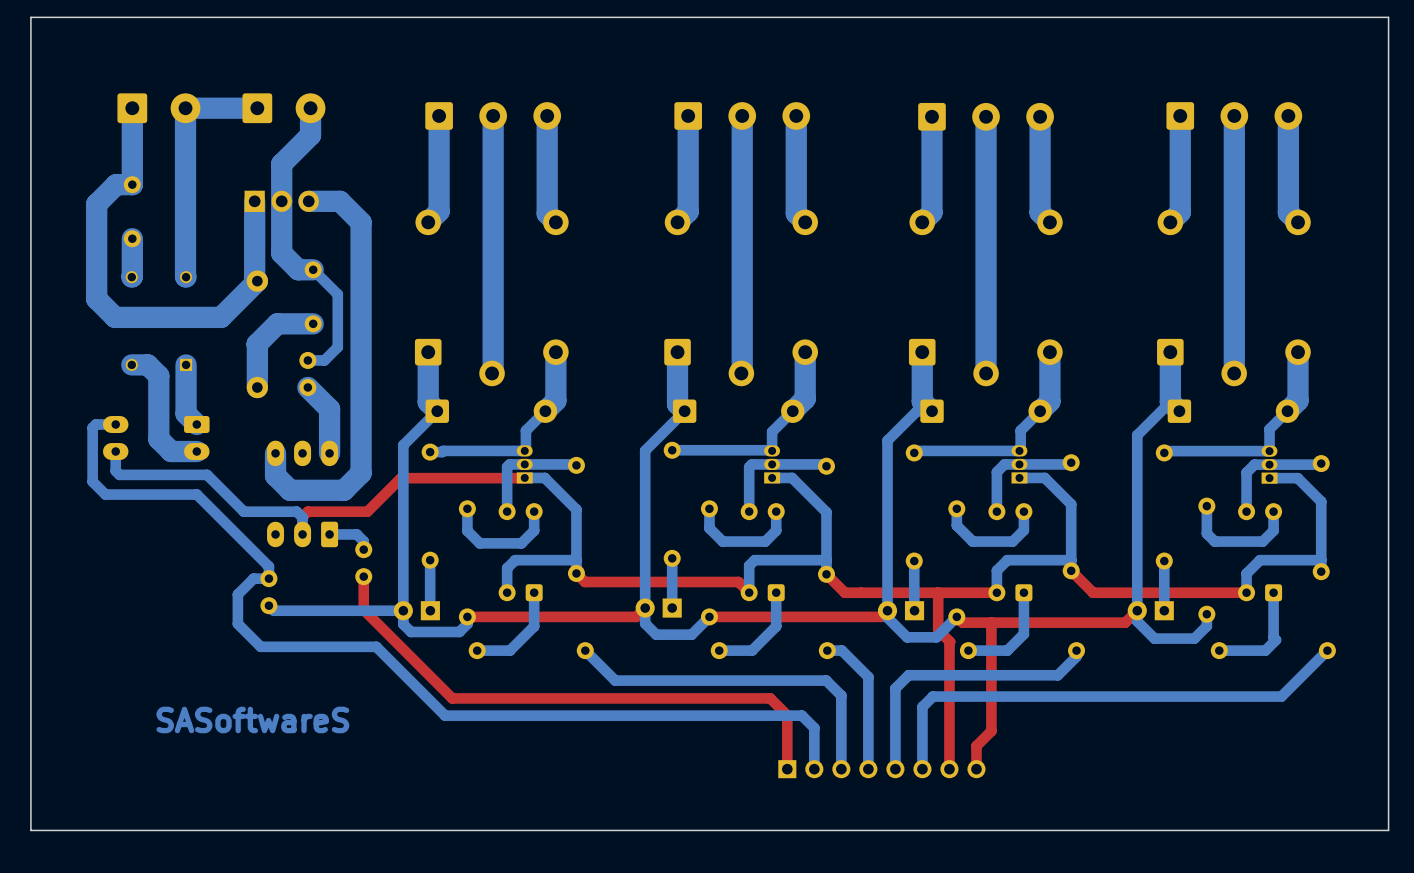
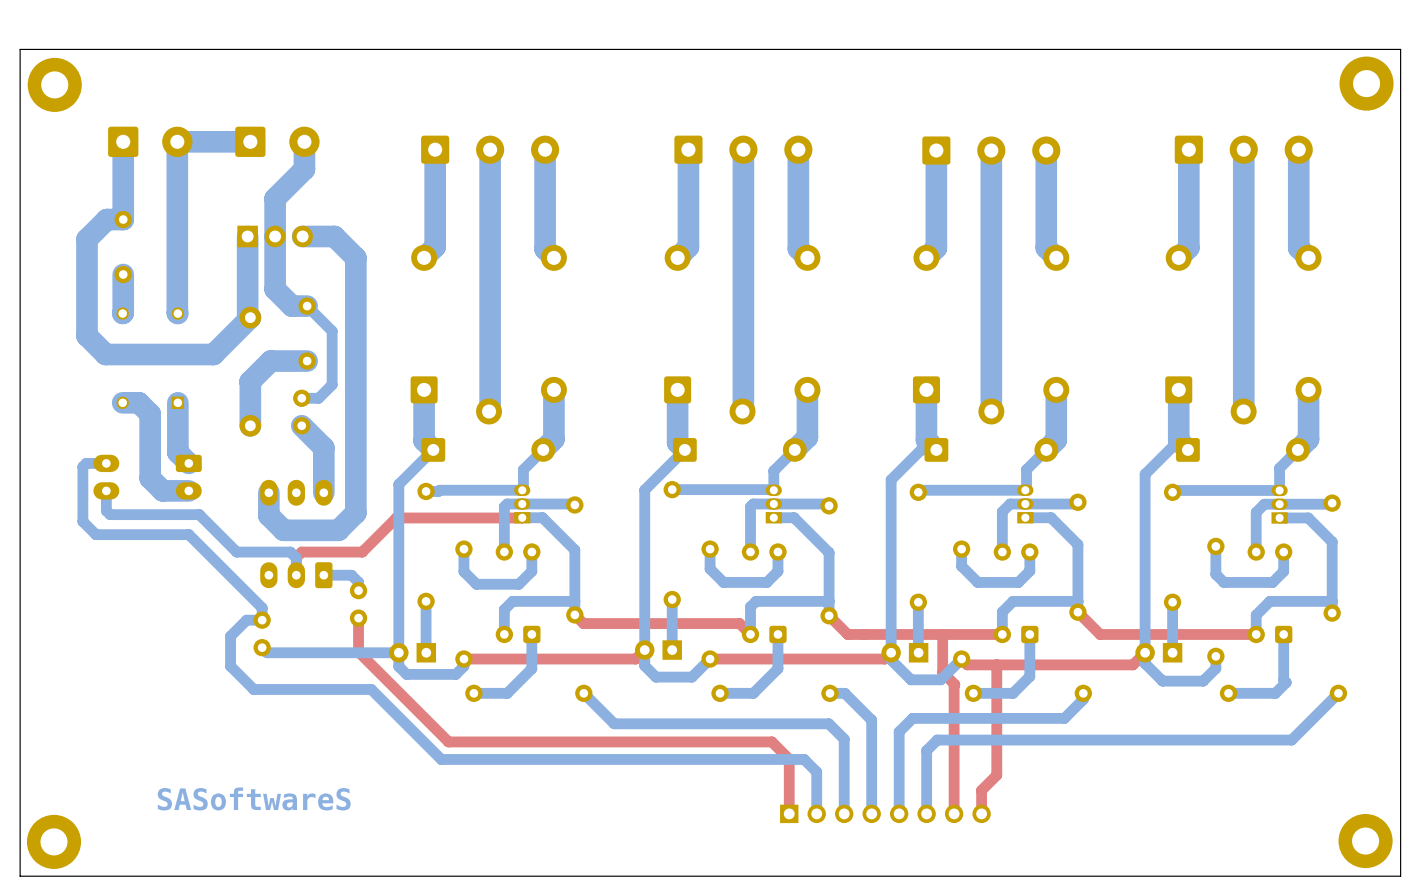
part: none -> (1366, 83)
part: none -> (54, 84)
text position: SASoftwareS (252, 719) -> SASoftwareS (254, 798)
part: none -> (1365, 841)
part: none -> (53, 841)

